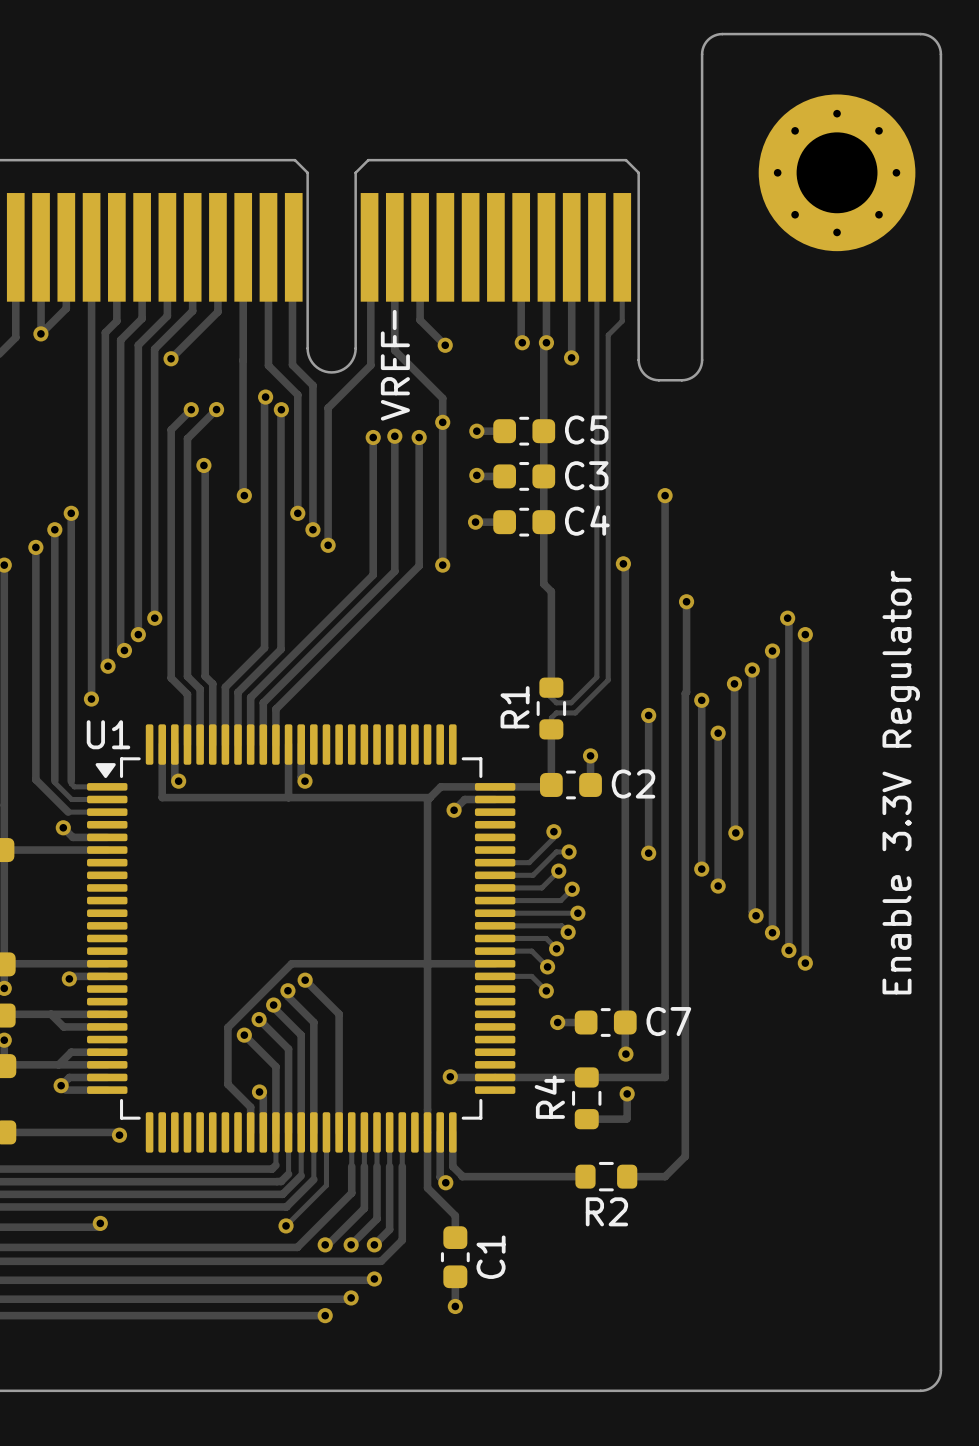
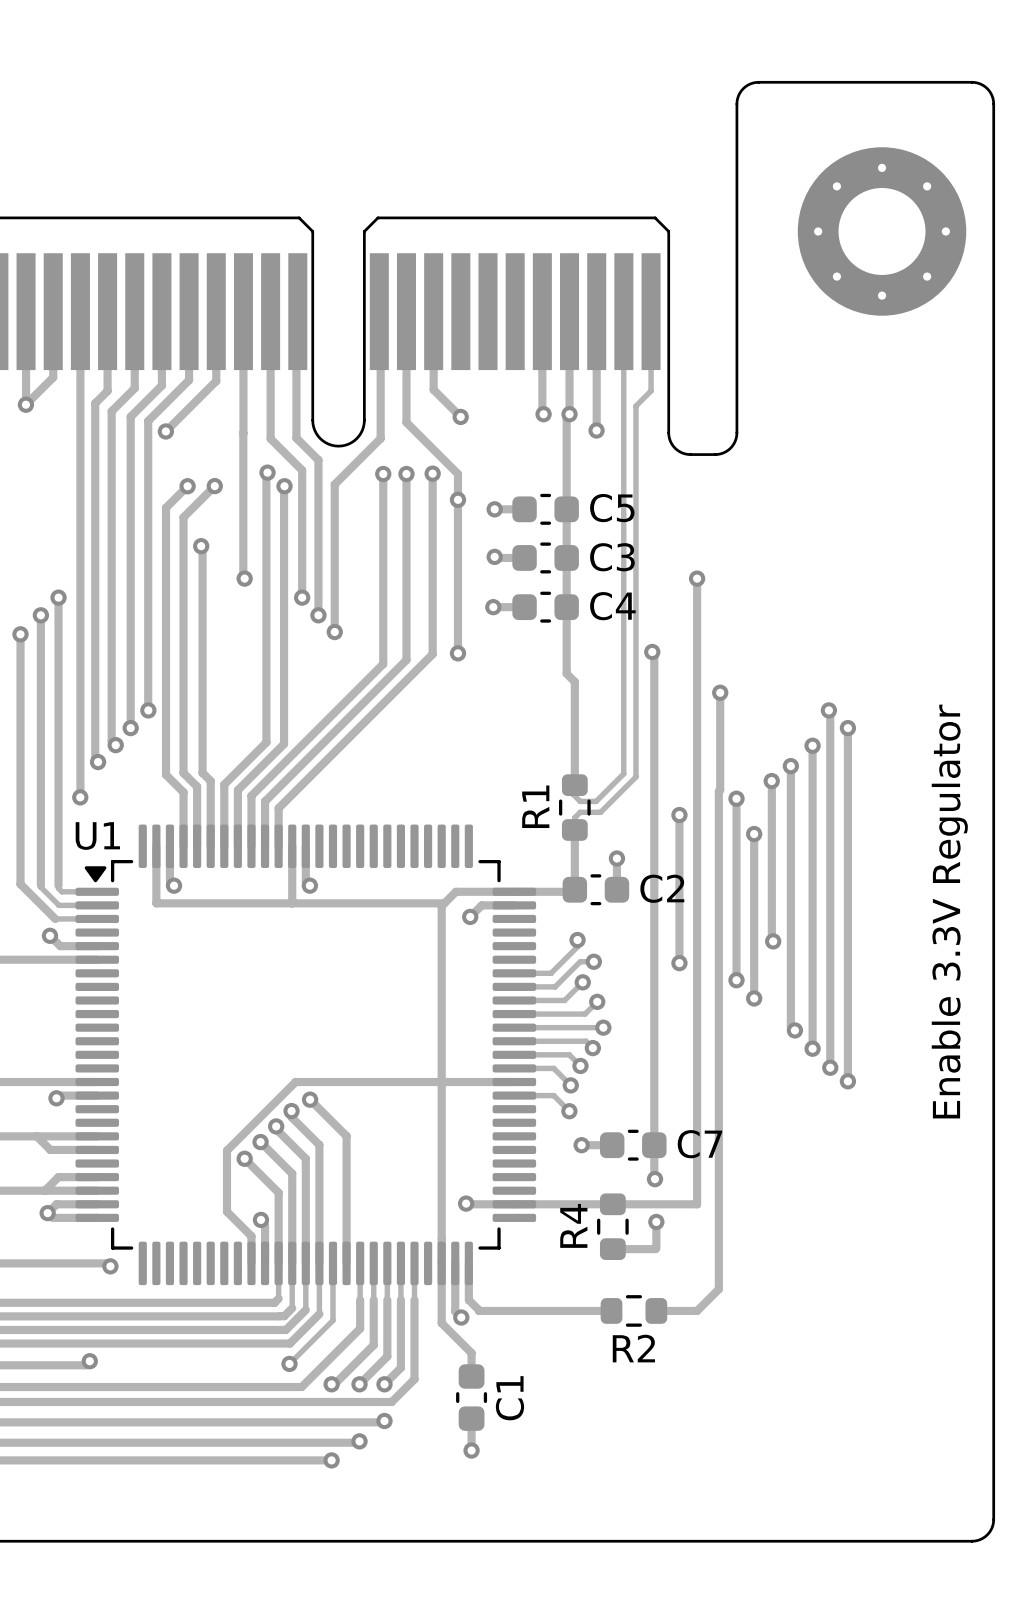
line: (394, 311) (394, 328) -> none
text: VREF (395, 375) -> none
track: none -> (383, 474) (383, 516)
via: none -> (383, 474)
track: none -> (406, 474) (406, 514)
via: none -> (406, 474)
track: none -> (432, 473) (432, 516)
via: none -> (432, 473)
via: (394, 436) -> none
via: (373, 437) -> none
via: (419, 437) -> none

